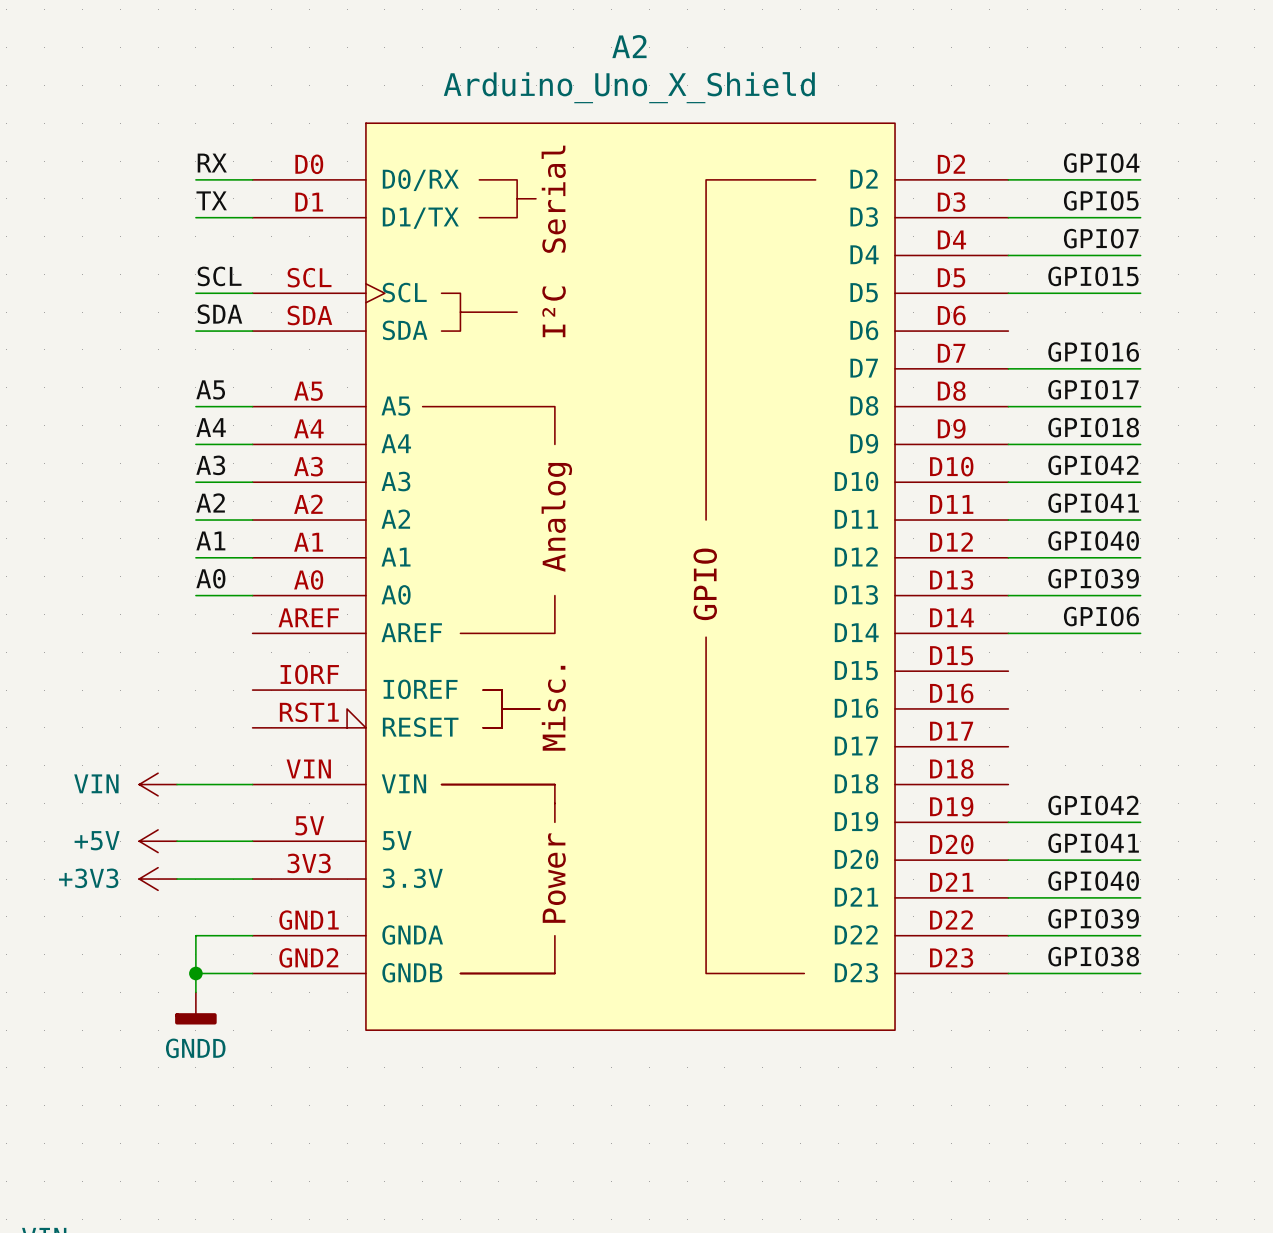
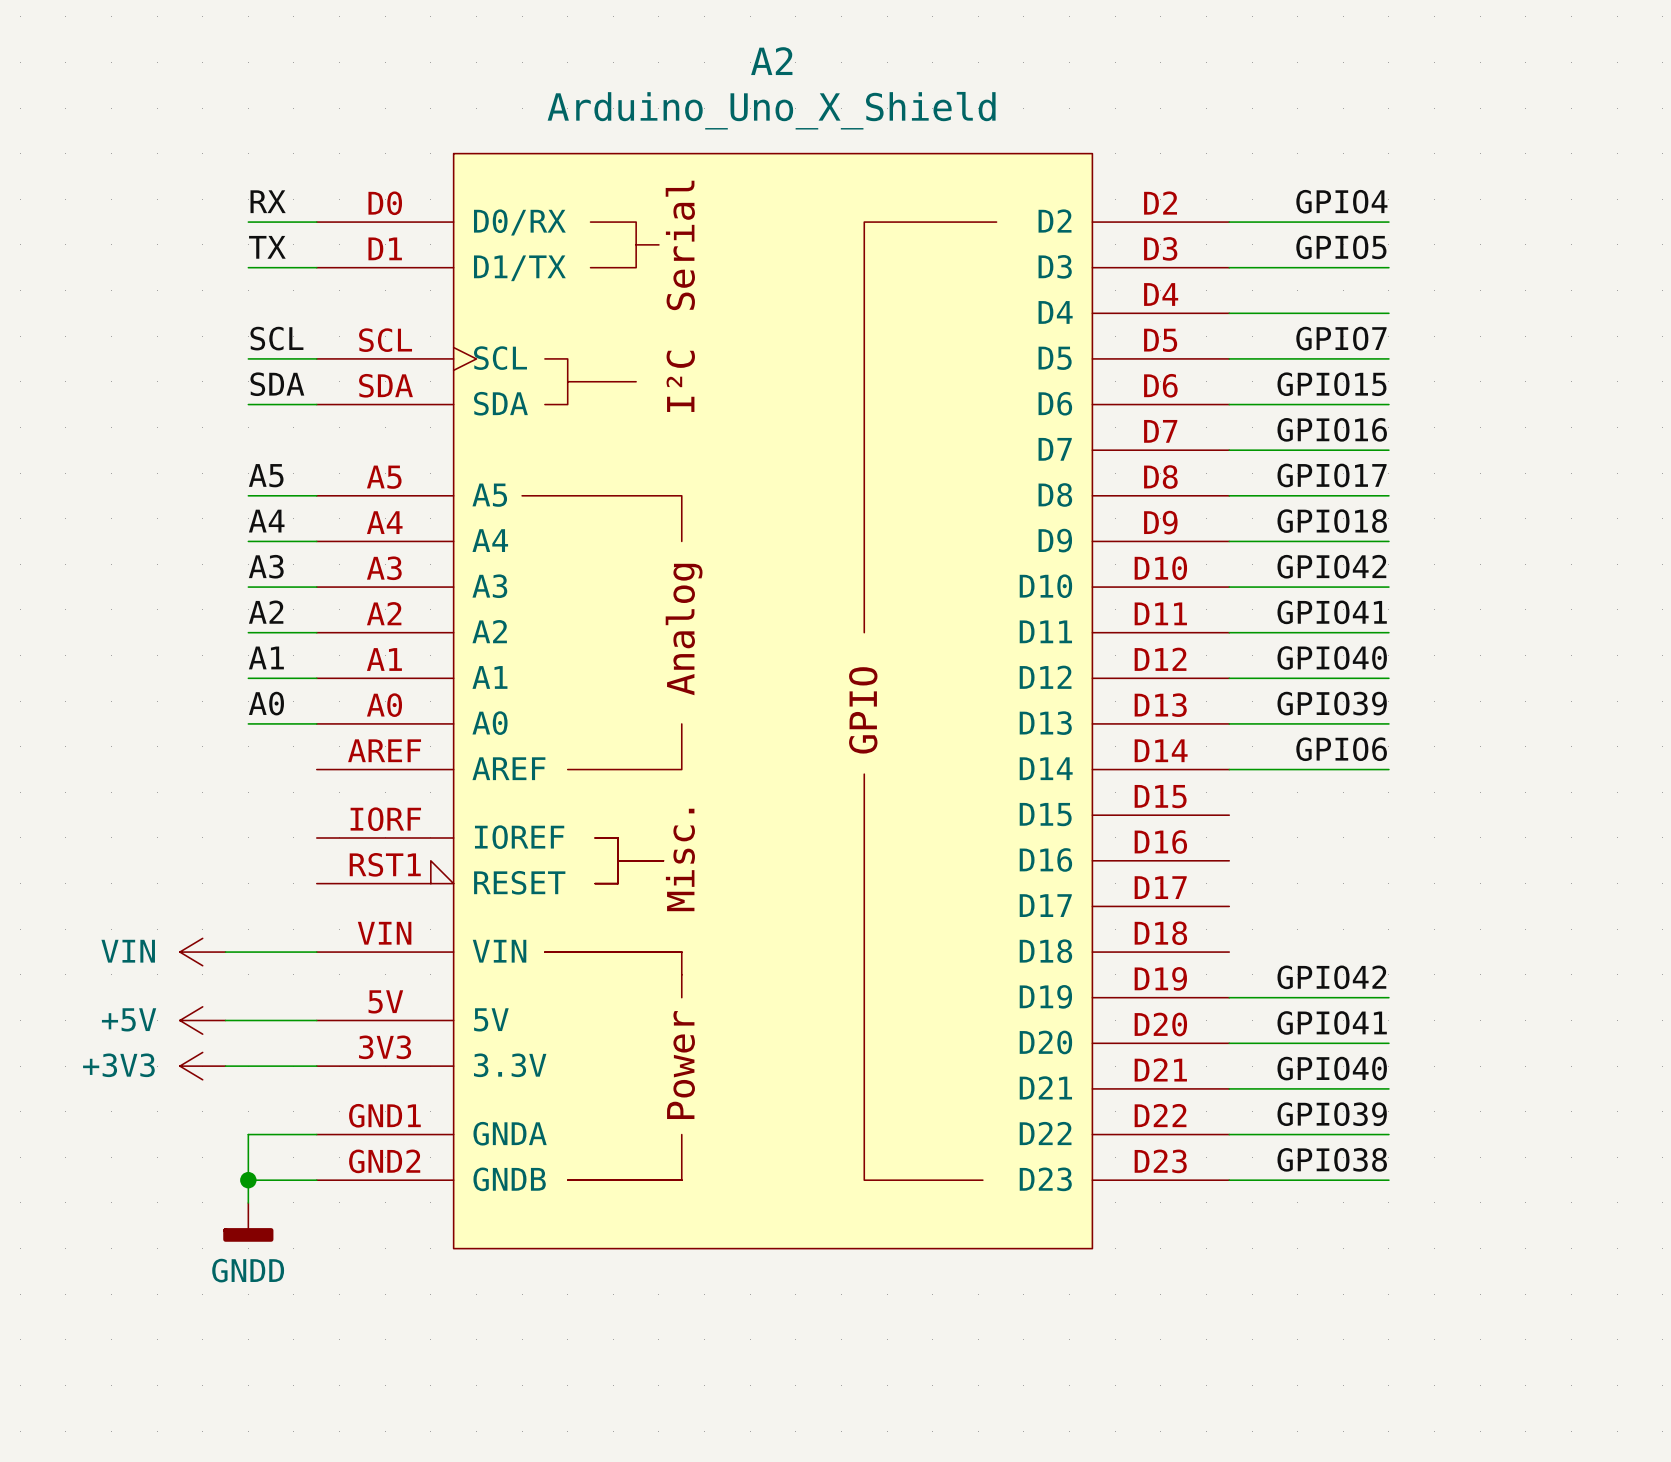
label: GPIO7 (1101, 238) -> none
label: GPIO15 (1093, 276) -> GPIO7 (1341, 338)
label: none -> GPIO15 (1331, 384)
wire: none -> (1229, 404) (1388, 404)

